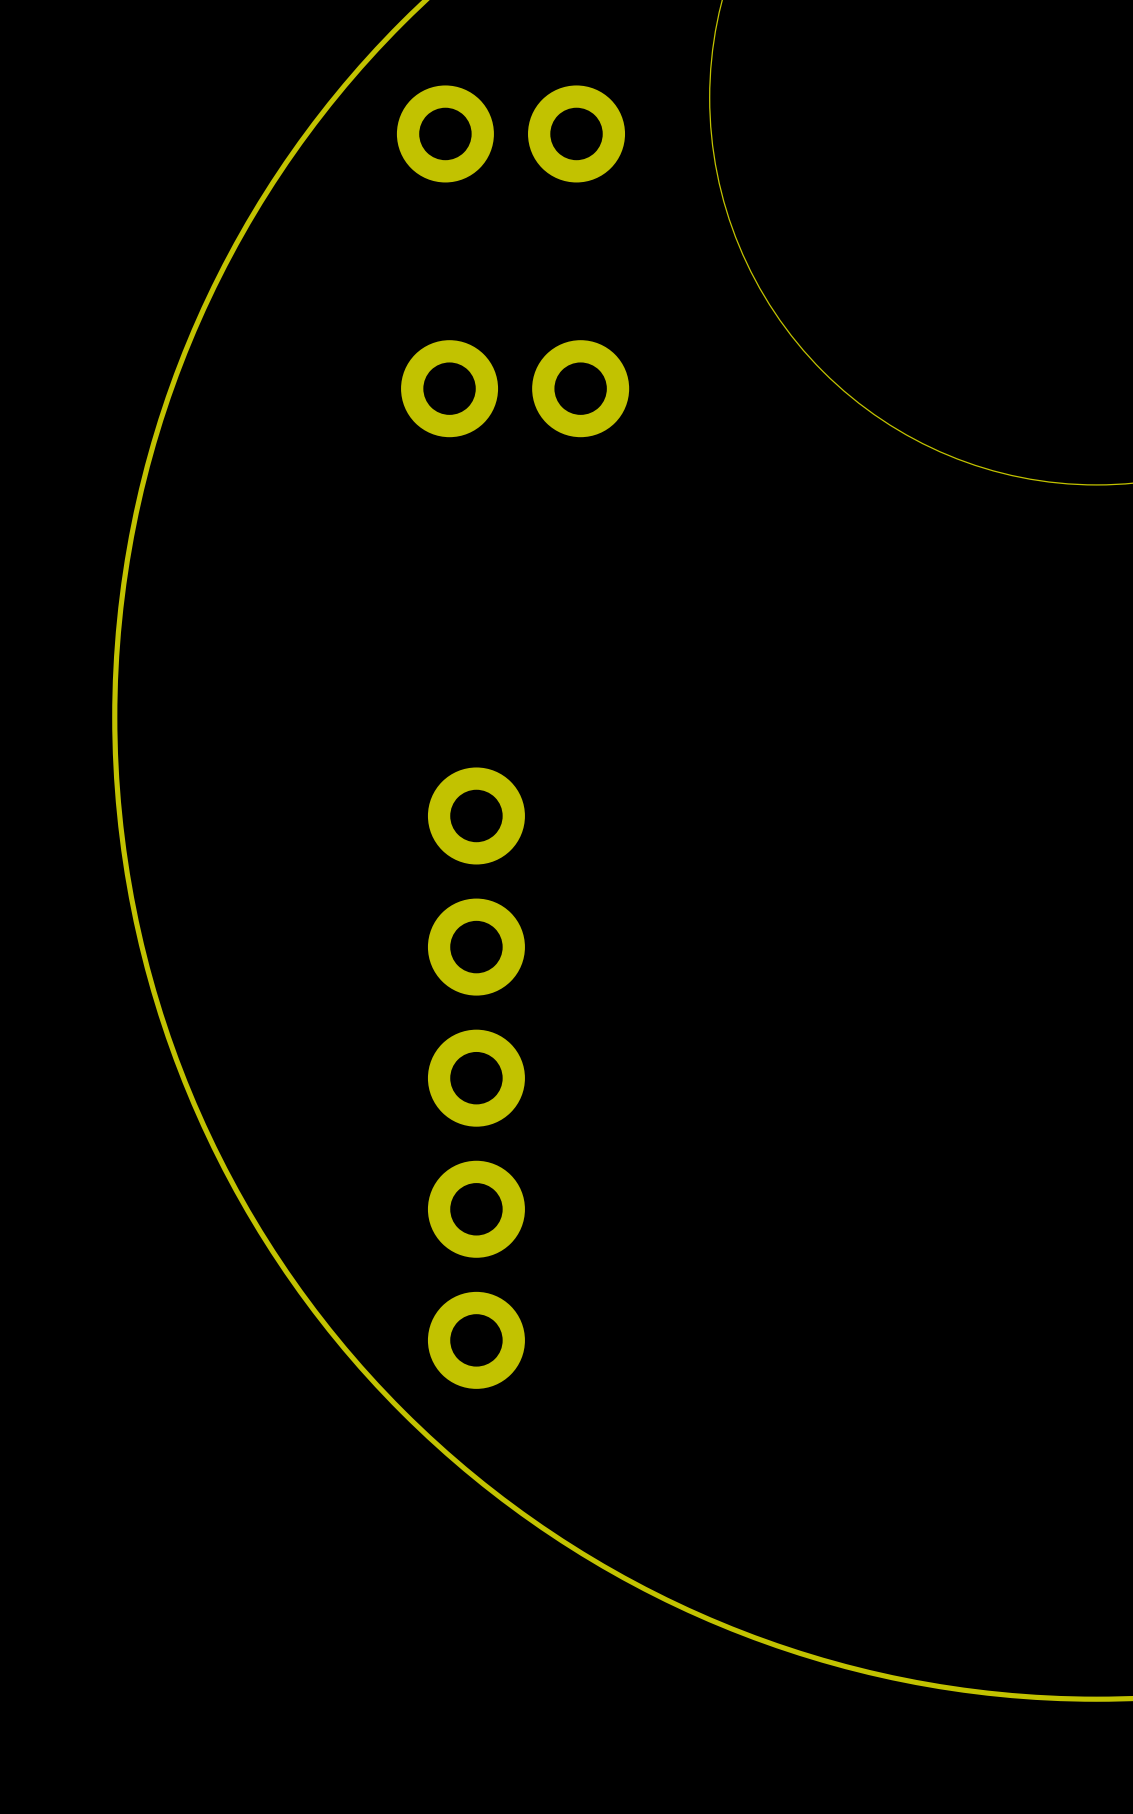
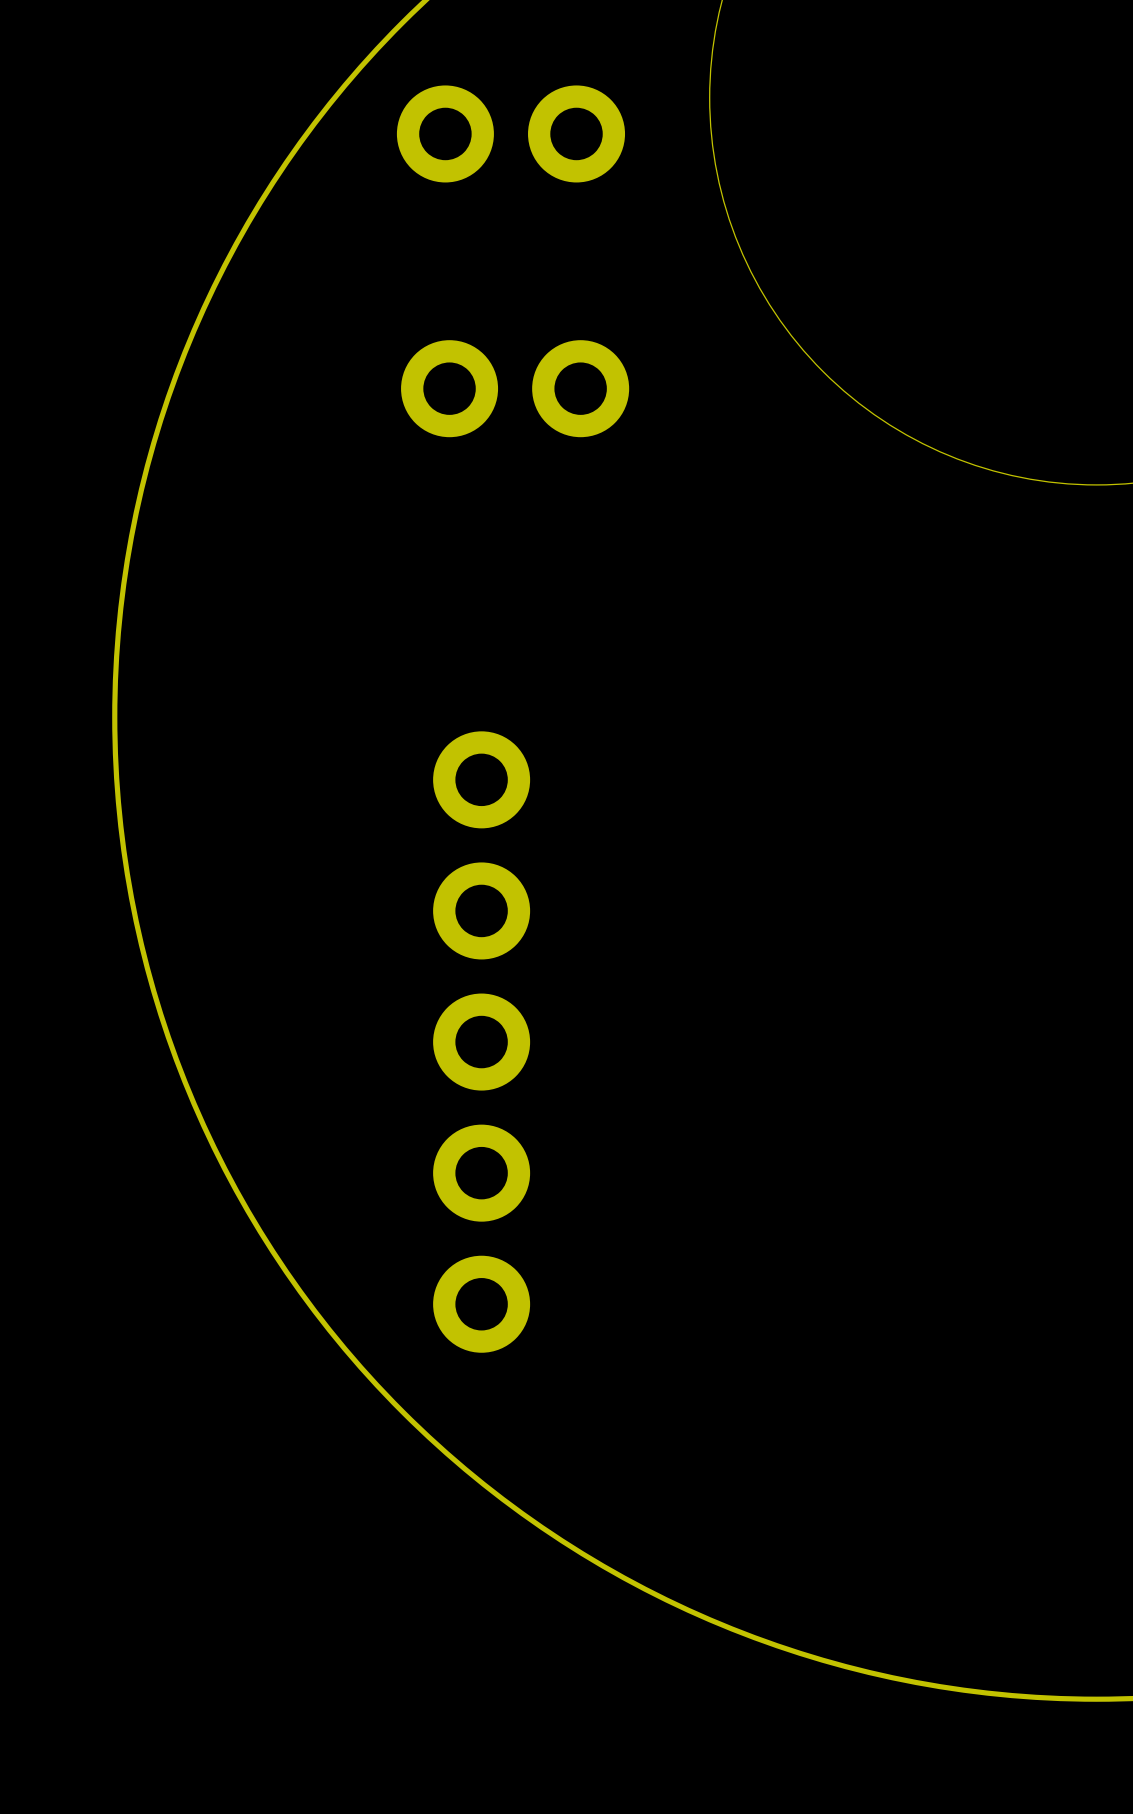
part position: (476, 1078) -> (481, 1042)

